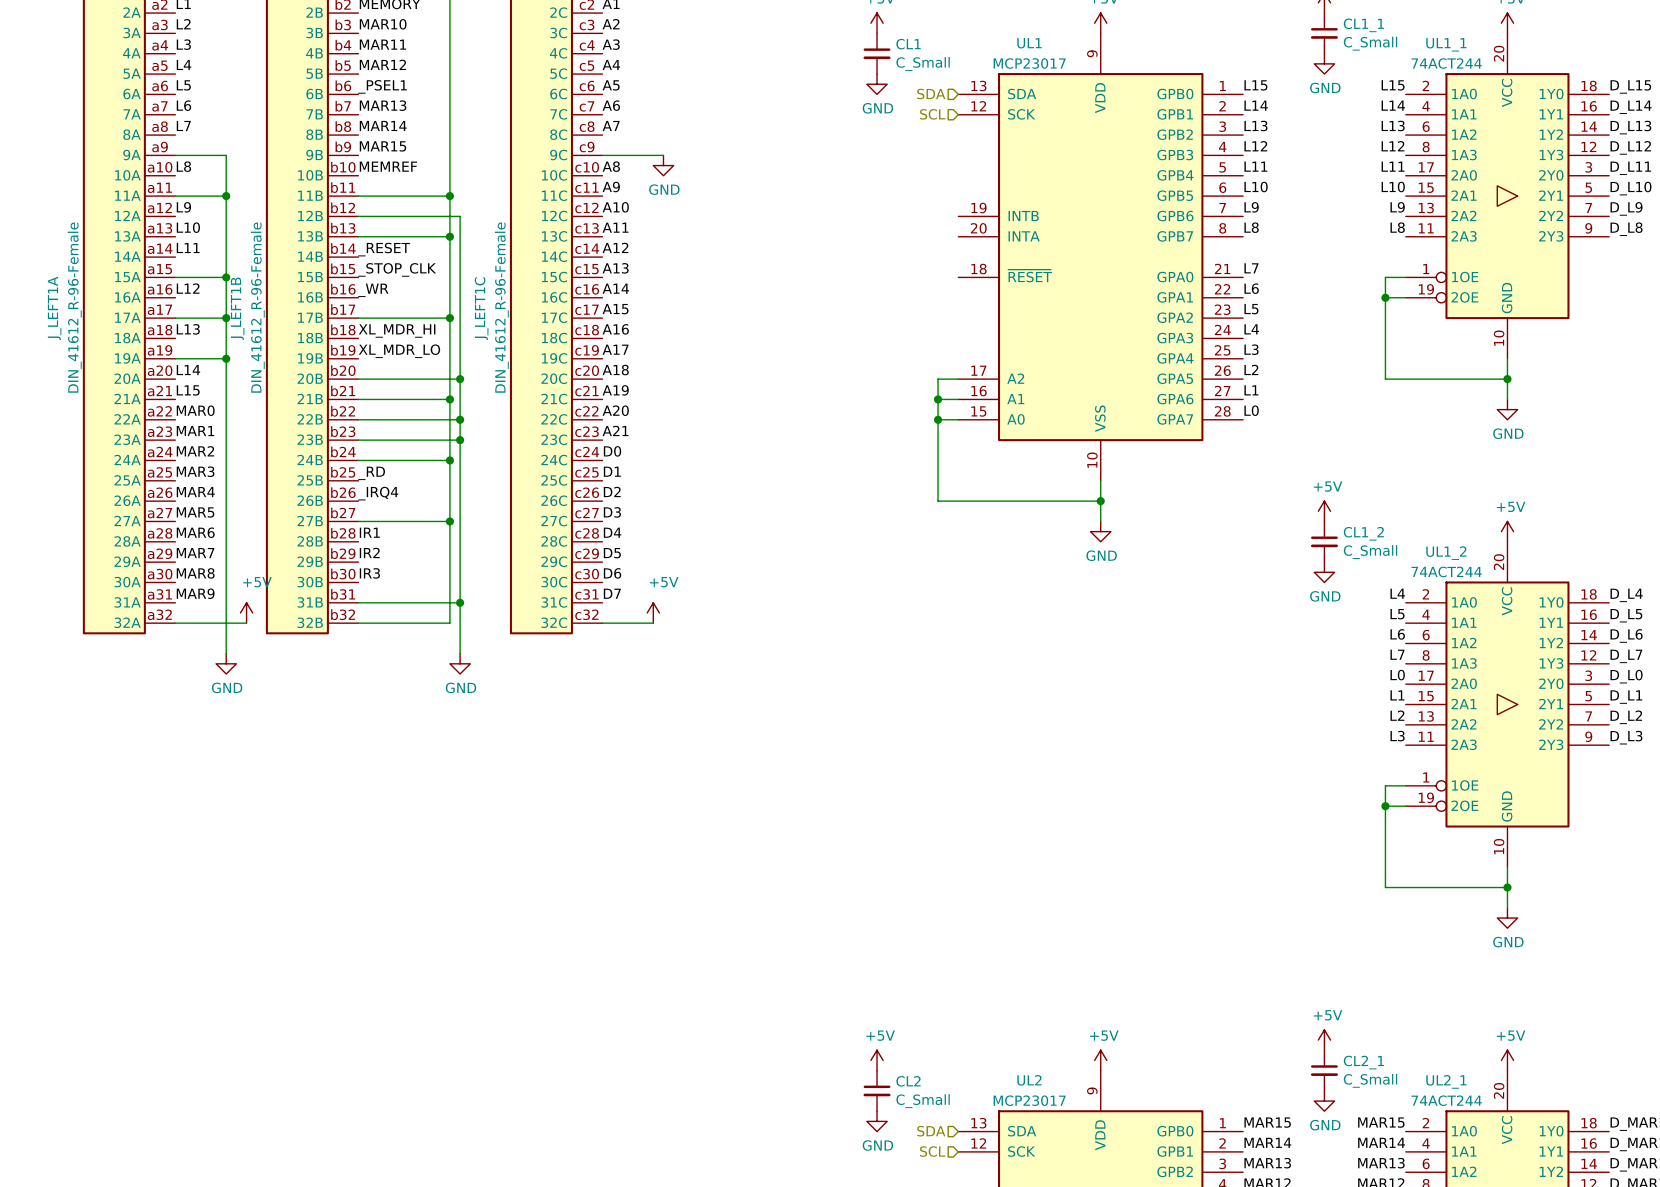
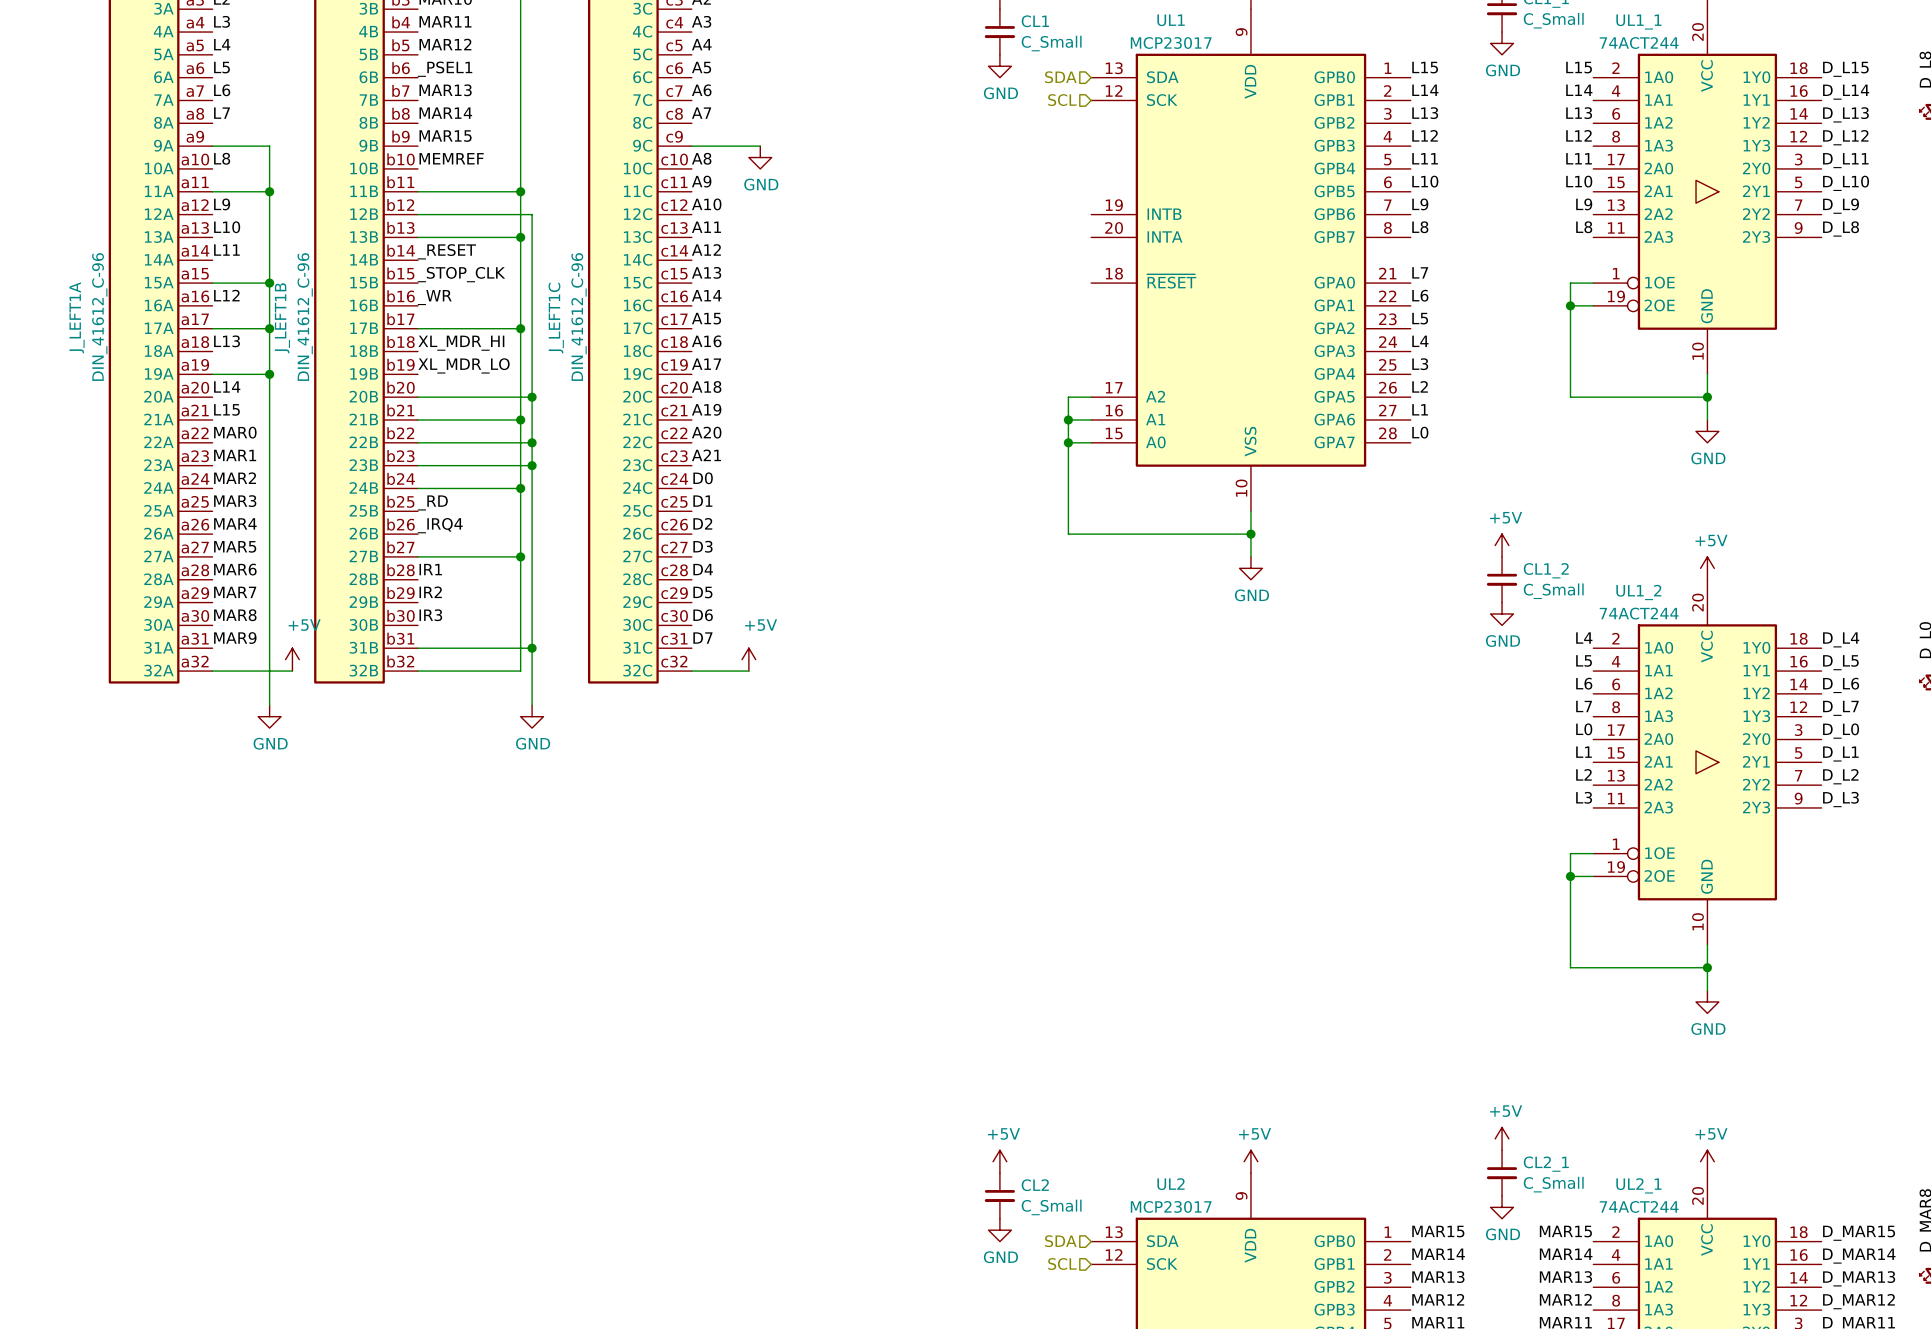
J_LEFT1A value: DIN_41612_R-96-Female (74, 307) -> DIN_41612_C-96 (99, 317)
J_LEFT1B value: DIN_41612_R-96-Female (257, 307) -> DIN_41612_C-96 (305, 317)
J_LEFT1C value: DIN_41612_R-96-Female (501, 307) -> DIN_41612_C-96 (579, 317)

